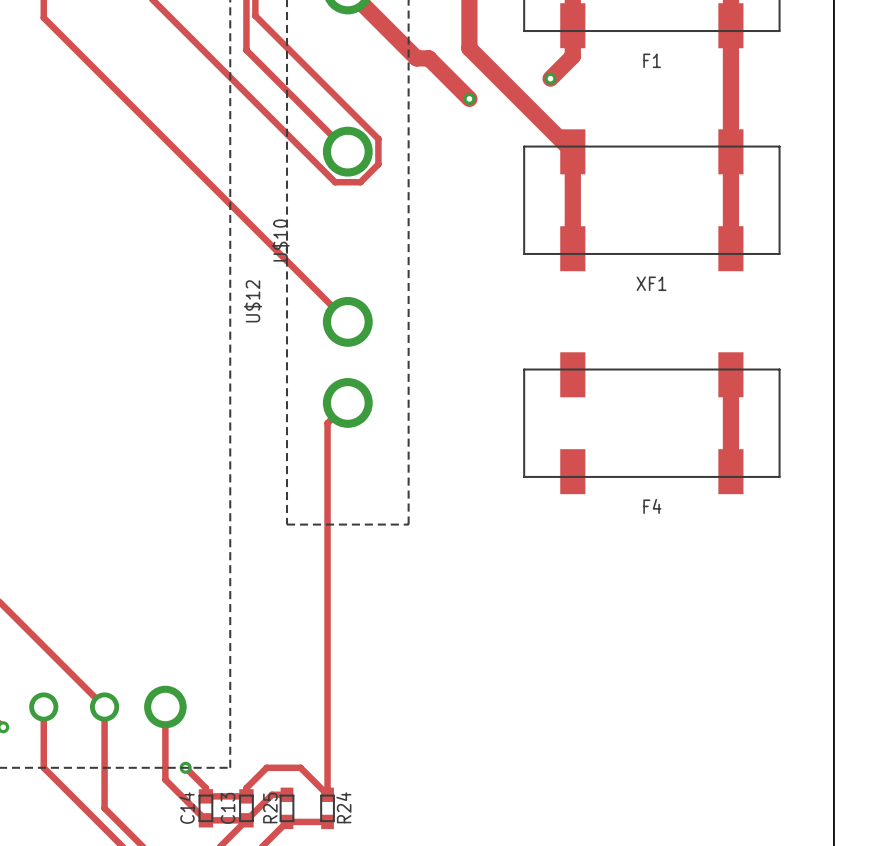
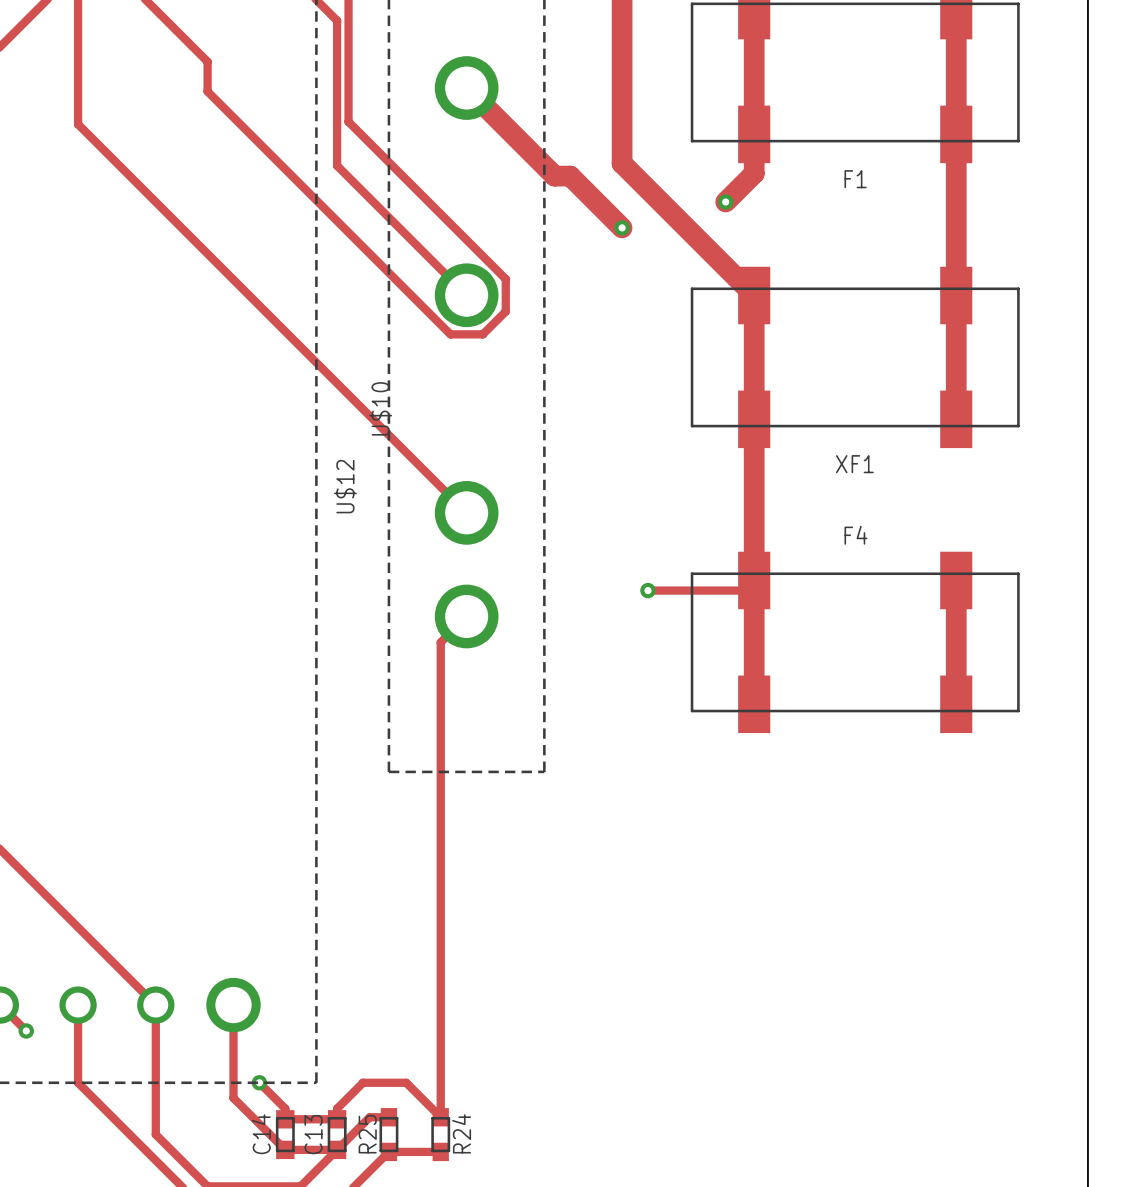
track: none -> (754, 419) (754, 704)
track: none -> (754, 580) (744, 590) (647, 590)
via: none -> (647, 590)
F4 name position: F4 (652, 506) -> F4 (855, 535)

